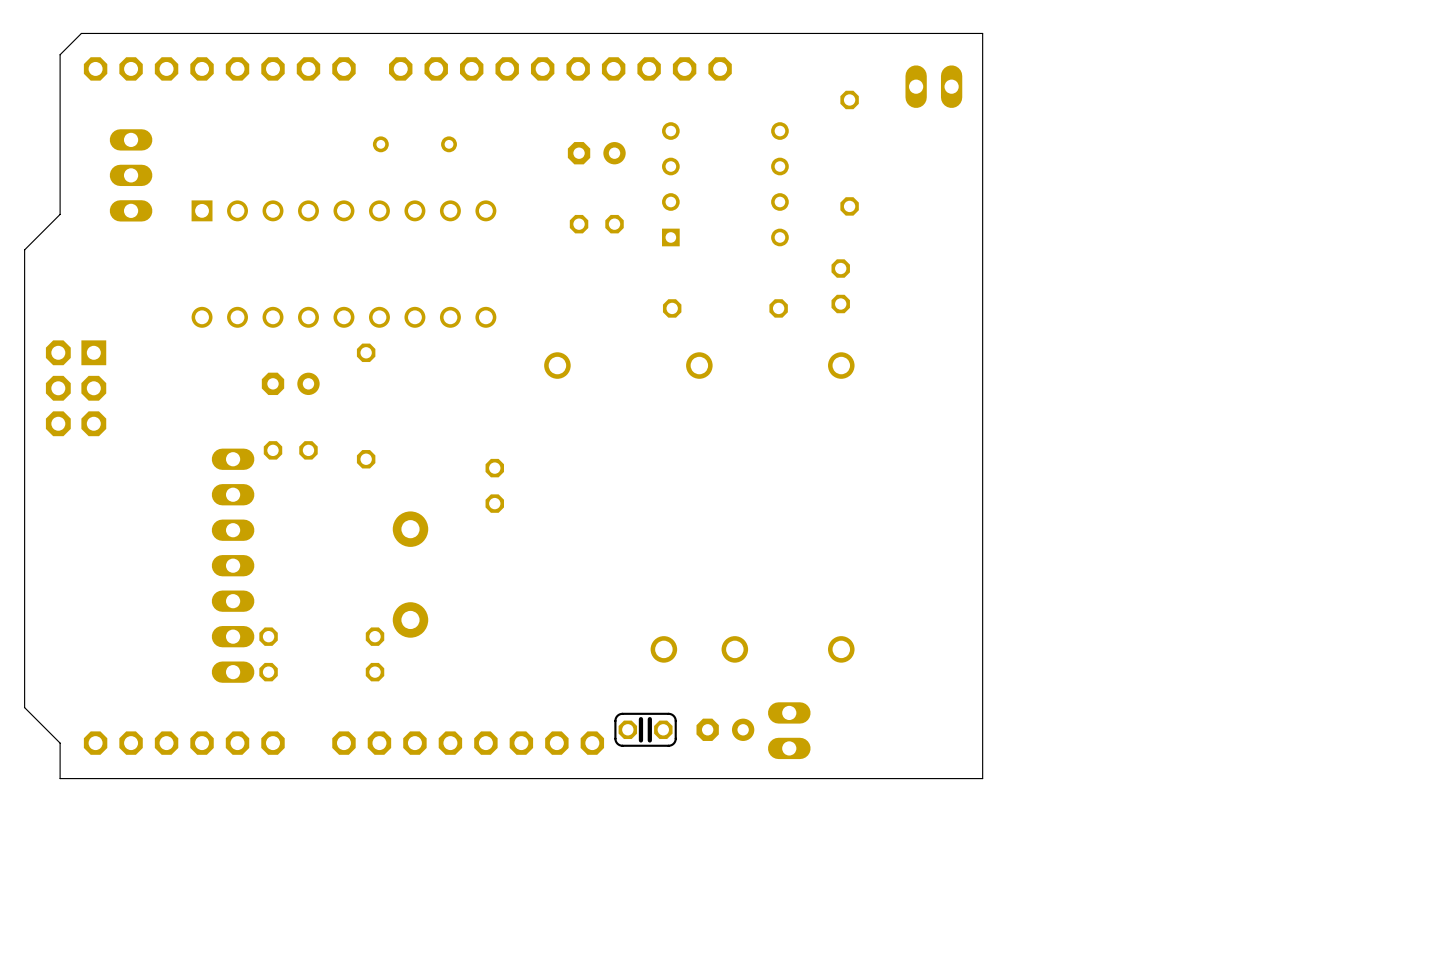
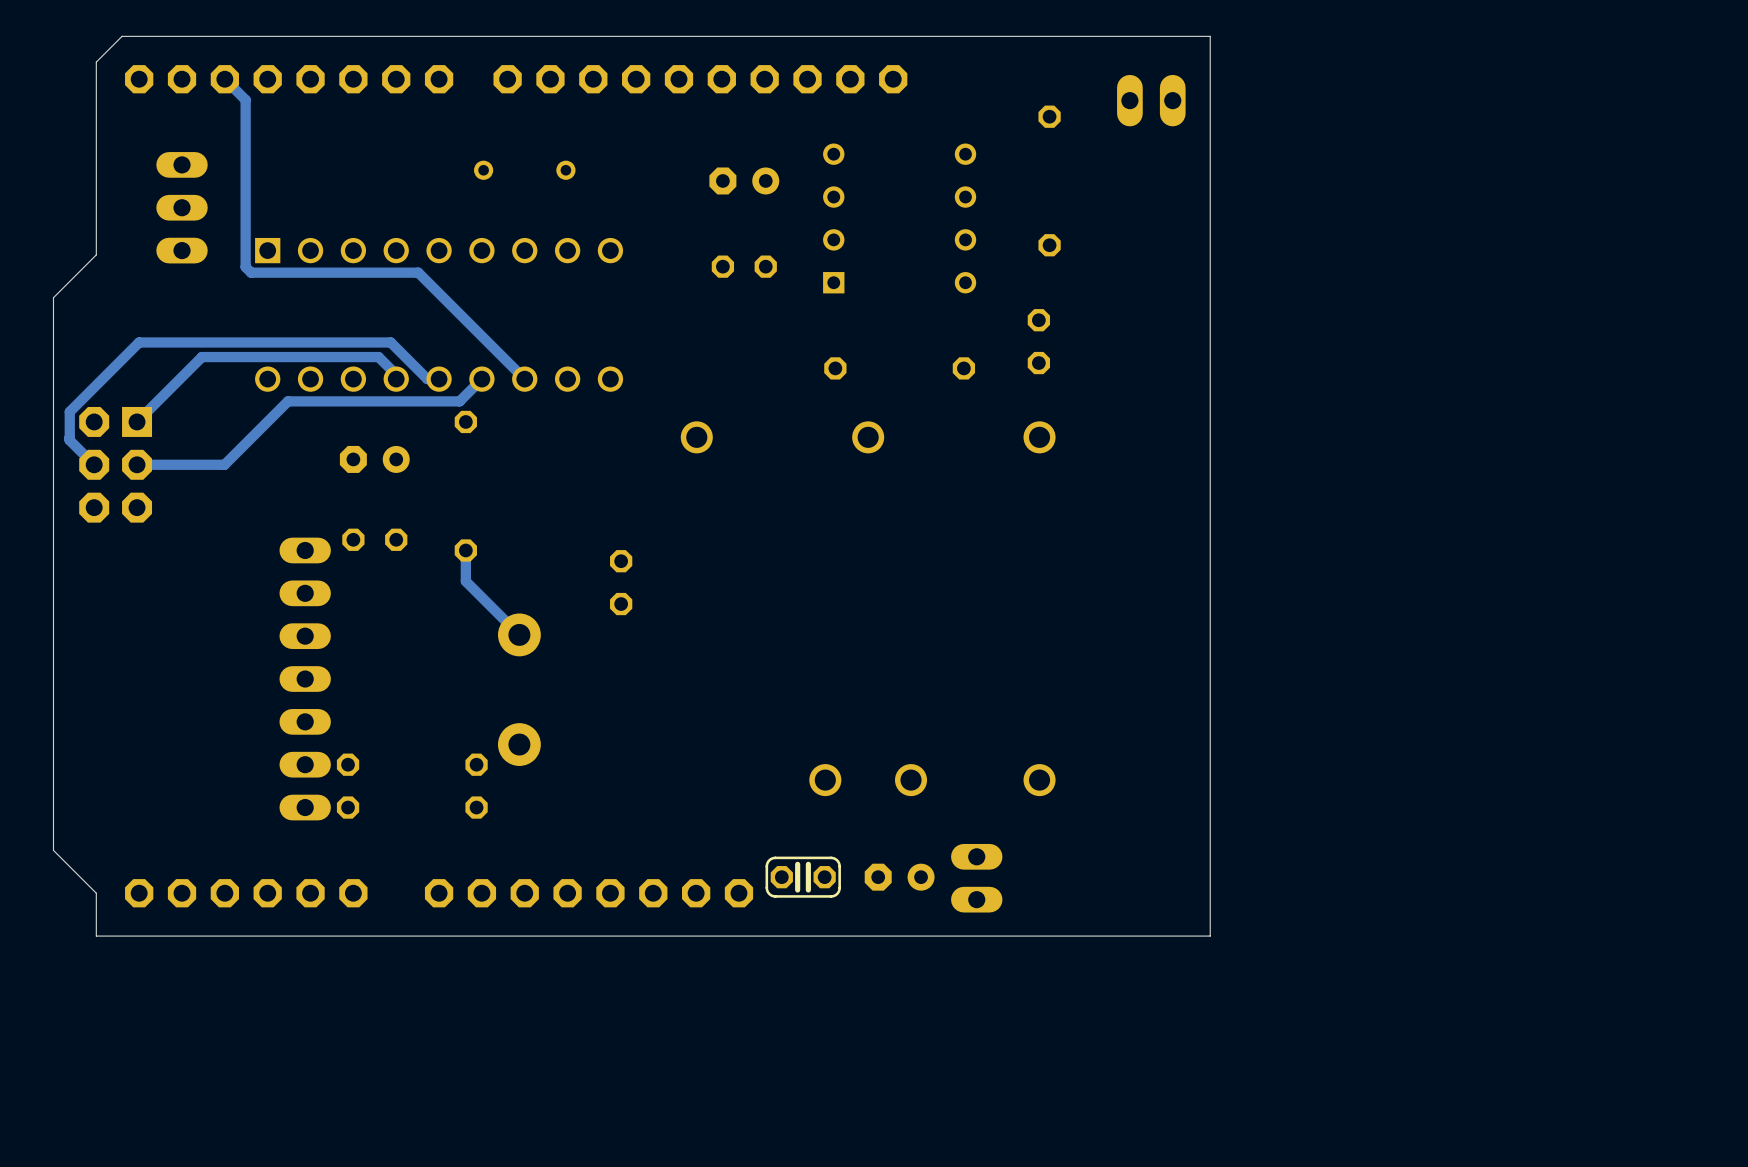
track: none -> (224, 79) (245, 99) (245, 267) (251, 272) (418, 272) (524, 379)
track: none -> (396, 379) (396, 374) (378, 357) (201, 357) (137, 421)
track: none -> (439, 379) (427, 379) (390, 342) (139, 342) (69, 411) (69, 437)
track: none -> (481, 379) (459, 401) (287, 401) (224, 464) (137, 464)
track: none -> (69, 438) (94, 464)
track: none -> (465, 550) (465, 581) (519, 634)

